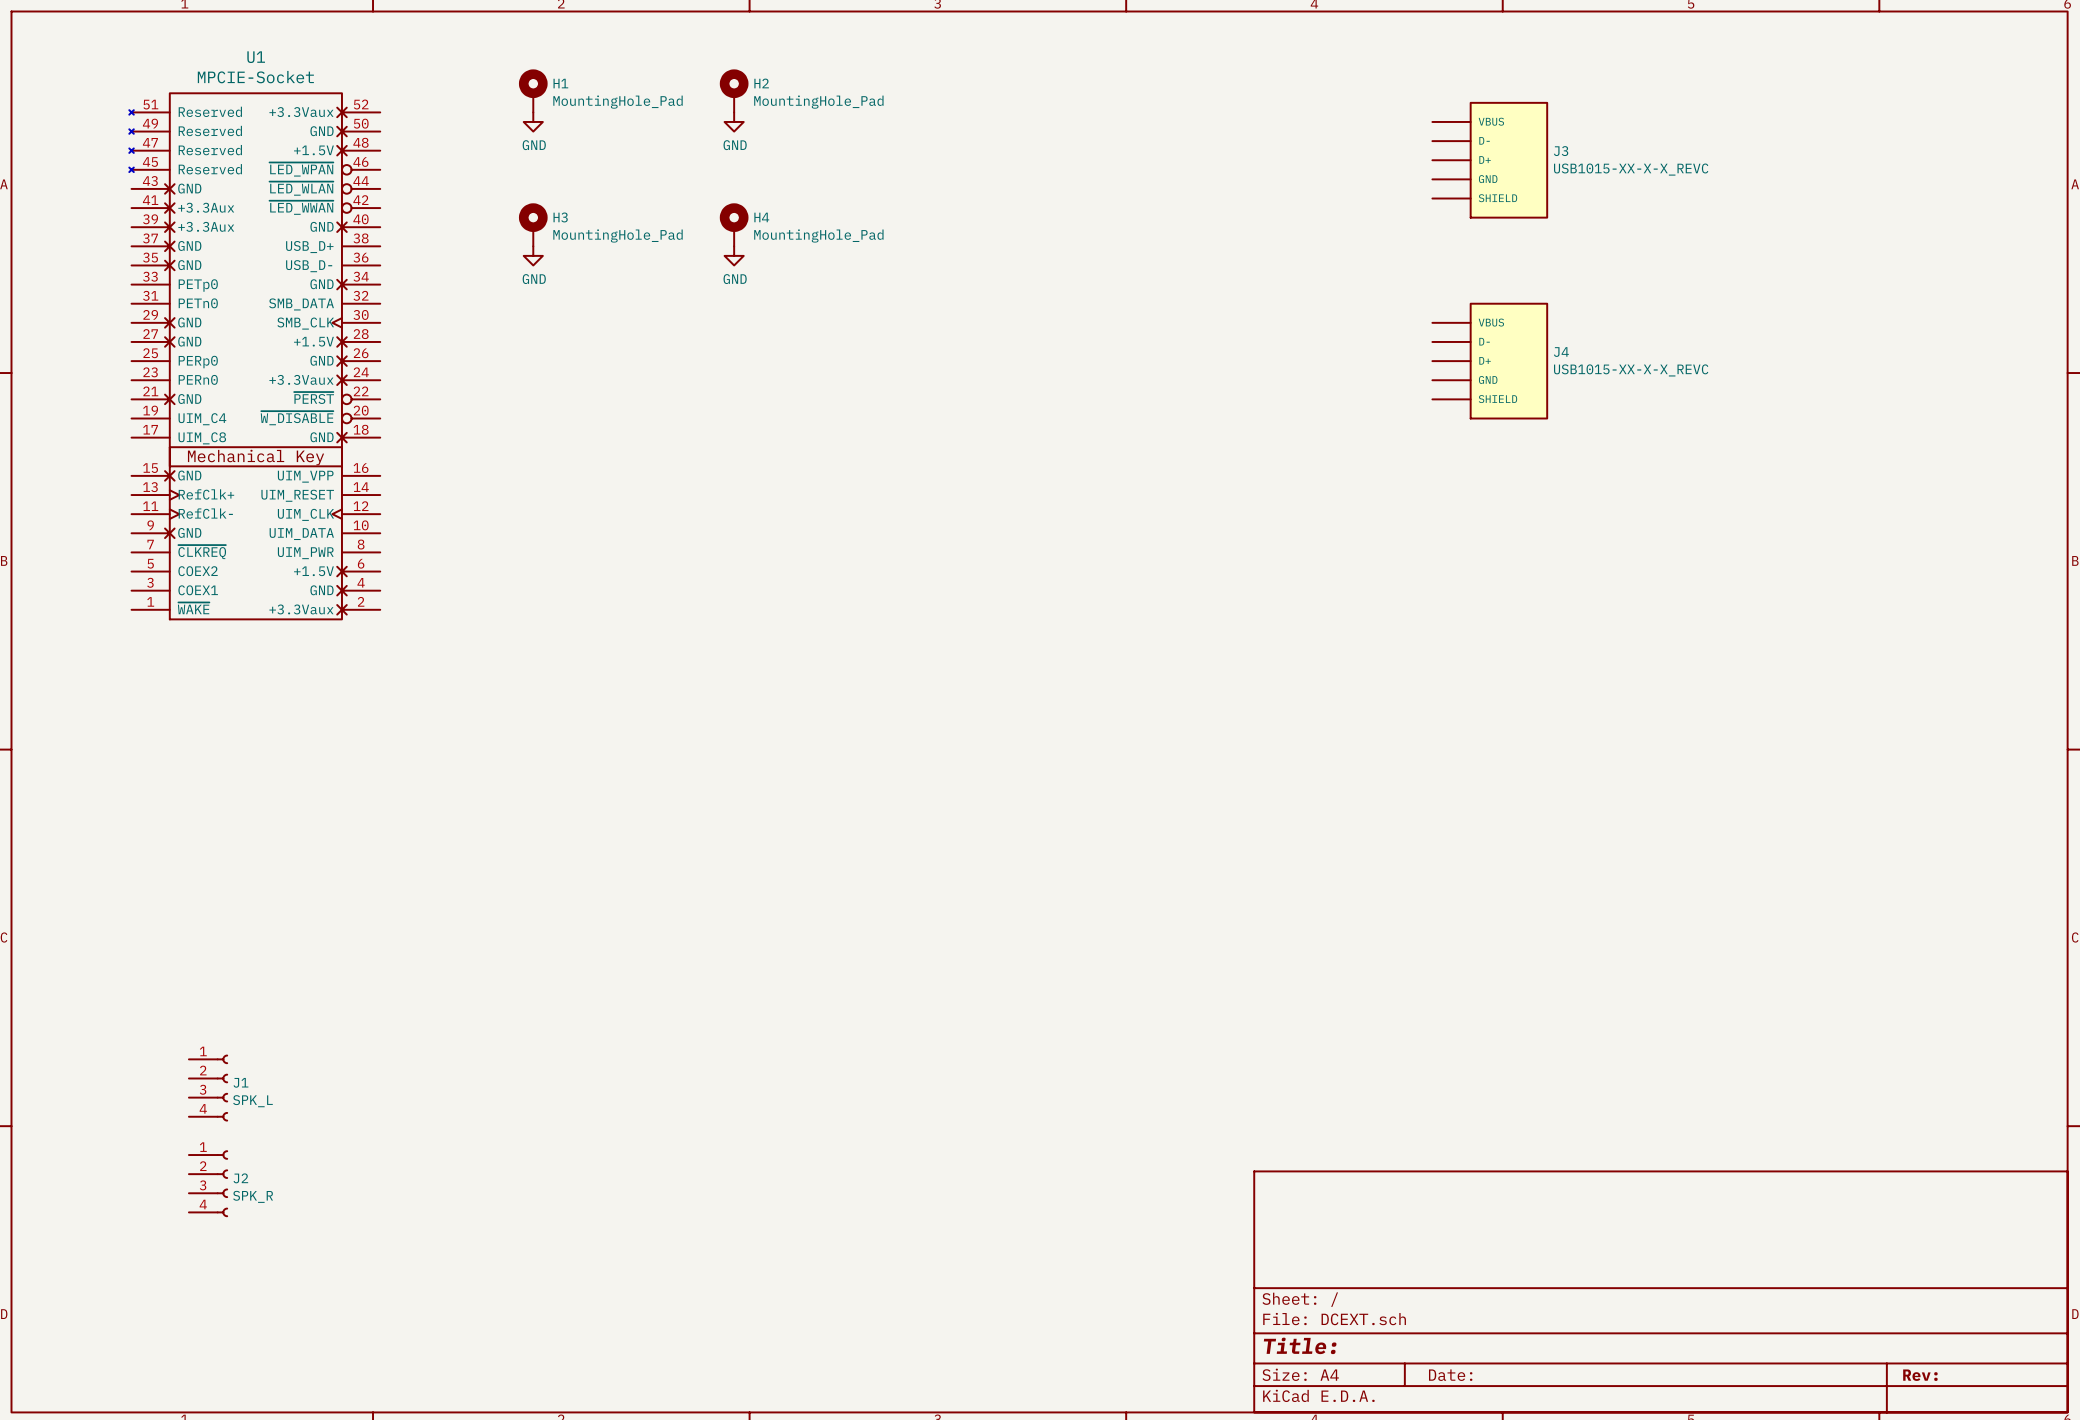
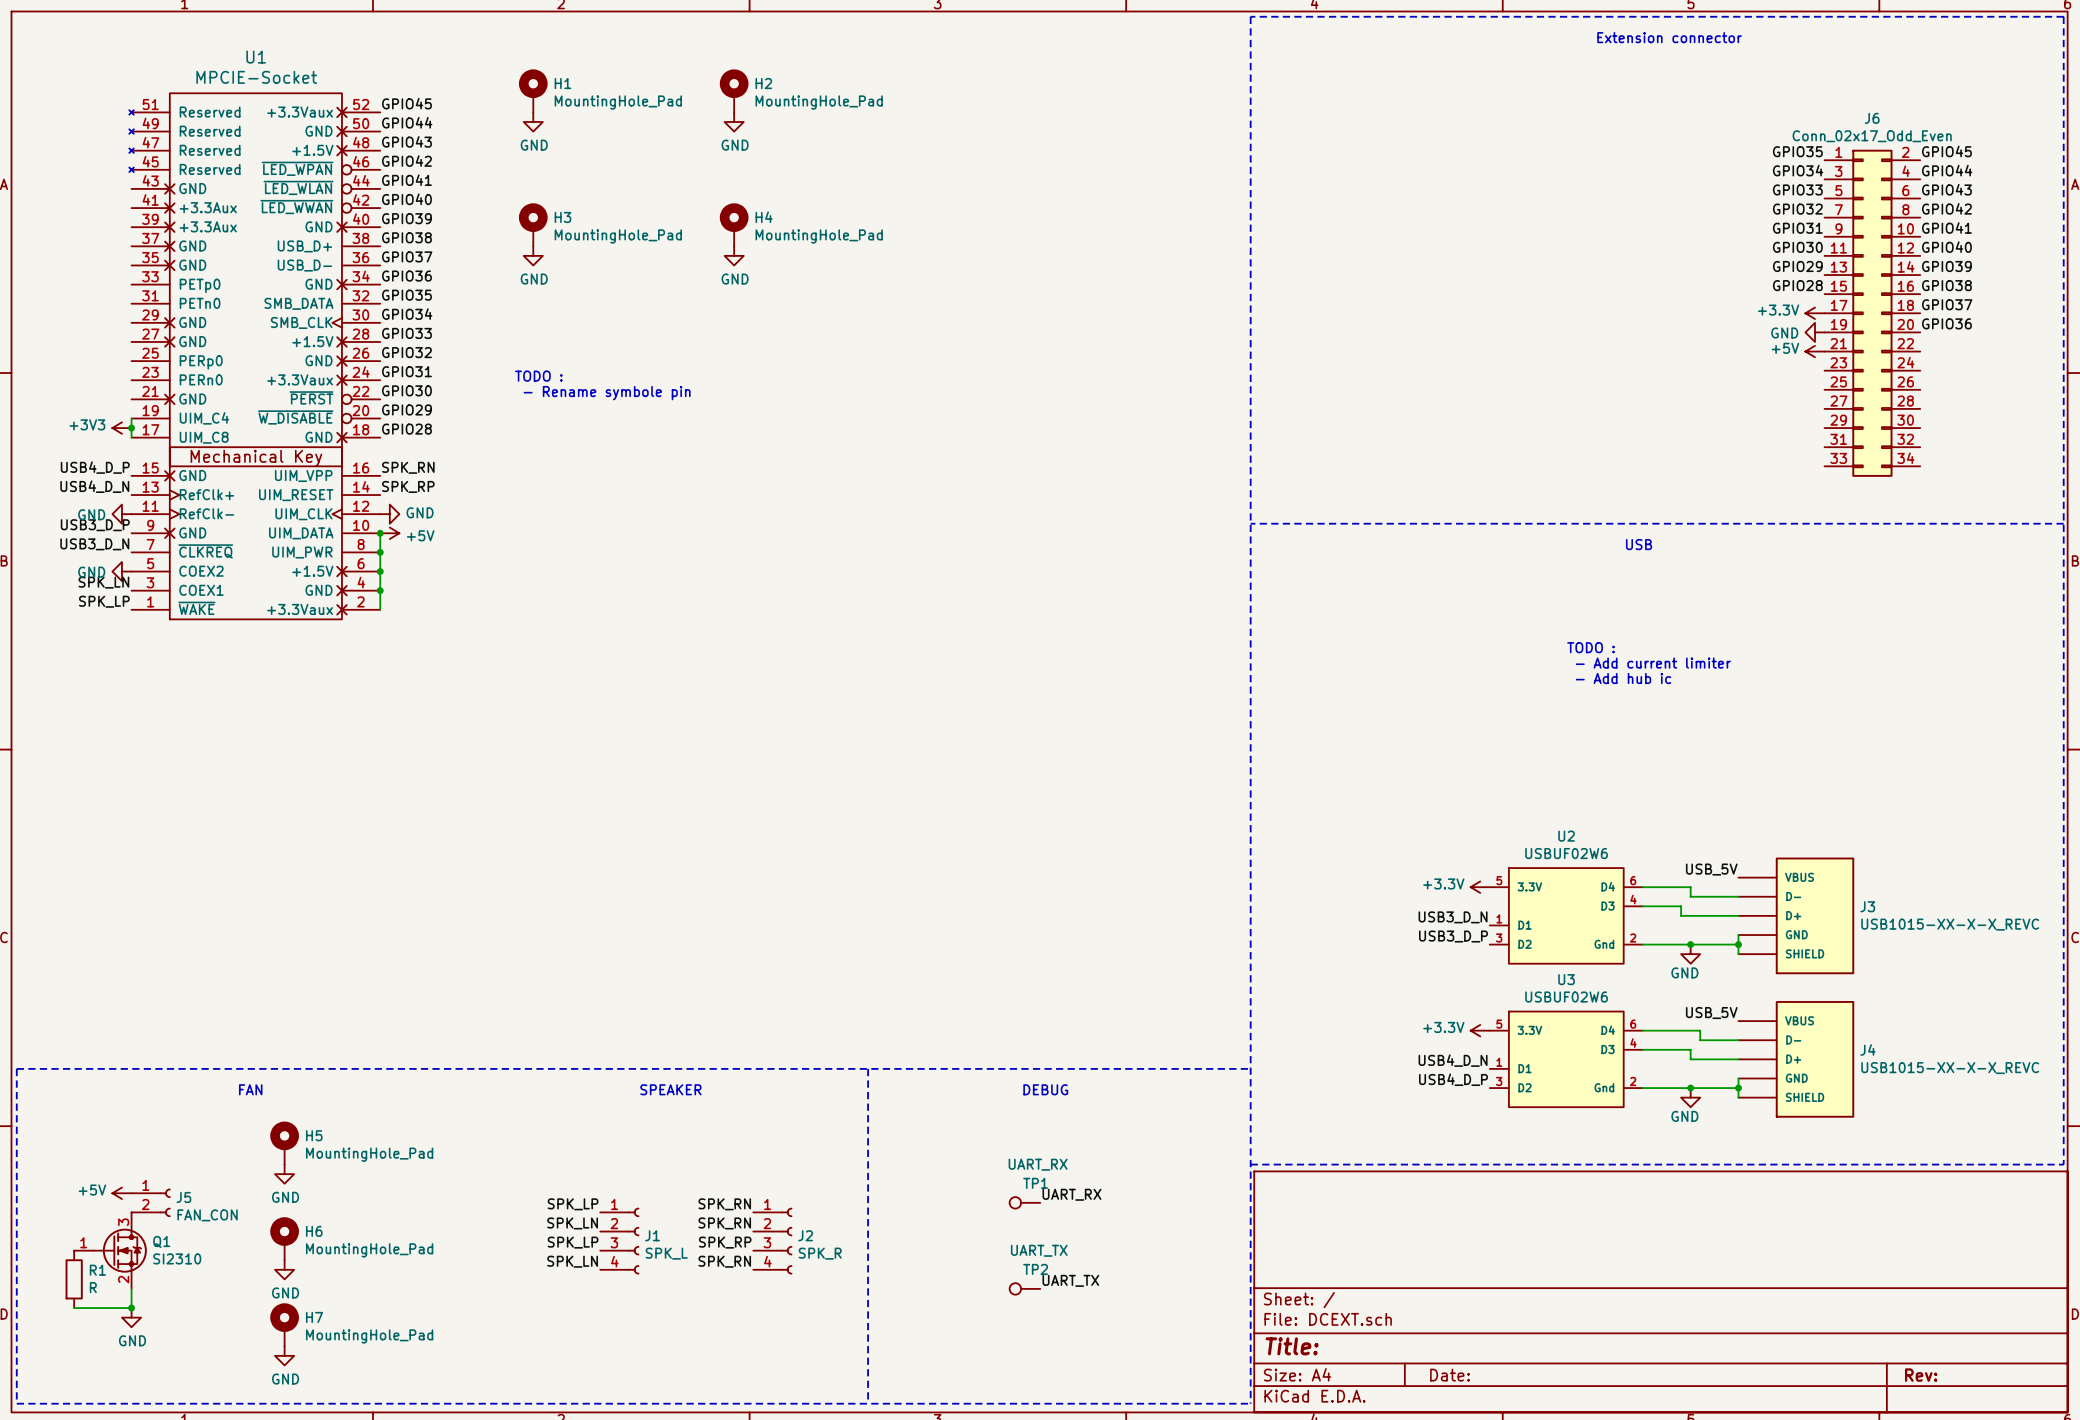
text: none -> Extension connector (1669, 37)
label: none -> GPIO45 (406, 103)
label: none -> GPIO44 (407, 122)
label: none -> GPIO43 (406, 141)
label: none -> GPIO35 (1797, 151)
label: none -> GPIO45 (1946, 151)
J3 position: (1490, 160) -> (1796, 915)
label: none -> GPIO42 (406, 161)
label: none -> GPIO34 (1798, 170)
label: none -> GPIO44 (1947, 170)
label: none -> GPIO41 (406, 180)
label: none -> GPIO33 (1797, 189)
label: none -> GPIO43 (1946, 189)
label: none -> GPIO40 (406, 199)
label: none -> GPIO32 (1797, 209)
label: none -> GPIO42 (1946, 208)
label: none -> GPIO39 (406, 218)
label: none -> GPIO31 (1797, 228)
label: none -> GPIO41 (1946, 228)
label: none -> GPIO38 (406, 237)
label: none -> GPIO30 (1797, 247)
label: none -> GPIO40 (1946, 247)
label: none -> GPIO37 (407, 256)
label: none -> GPIO29 (1797, 266)
label: none -> GPIO39 (1946, 266)
label: none -> GPIO36 (406, 276)
label: none -> GPIO28 (1797, 285)
label: none -> GPIO38 (1946, 285)
label: none -> GPIO35 (406, 295)
label: none -> GPIO37 (1947, 304)
power symbol: none -> +3.3V (1815, 313)
J6: none -> Conn_02x17_Odd_Even (1872, 313)
label: none -> GPIO34 (407, 314)
label: none -> GPIO36 (1946, 323)
power symbol: none -> GND (1815, 332)
label: none -> GPIO33 (406, 333)
power symbol: none -> +5V (1815, 351)
label: none -> GPIO32 (406, 352)
J4 position: (1490, 361) -> (1796, 1059)
label: none -> GPIO31 (406, 371)
text: none -> TODO : (538, 376)
label: none -> GPIO30 (406, 390)
text: none -> - Rename symbole pin (607, 393)
label: none -> GPIO29 (406, 409)
wire: none -> (131, 418) (131, 437)
power symbol: none -> +3V3 (121, 428)
junction: none -> (131, 428)
label: none -> GPIO28 (406, 429)
label: none -> USB4_D_P (95, 467)
label: none -> SPK_RN (408, 467)
label: none -> USB4_D_N (94, 486)
label: none -> SPK_RP (408, 486)
power symbol: none -> GND (121, 514)
power symbol: none -> GND (389, 514)
line: none -> (1250, 523) (2063, 523)
label: none -> USB3_D_P (95, 525)
wire: none -> (380, 533) (380, 609)
junction: none -> (380, 533)
power symbol: none -> +5V (389, 533)
label: none -> USB3_D_N (94, 544)
text: none -> USB (1639, 544)
junction: none -> (380, 552)
power symbol: none -> GND (121, 571)
junction: none -> (380, 571)
label: none -> SPK_LN (103, 582)
junction: none -> (380, 590)
label: none -> SPK_LP (104, 601)
text: none -> TODO : (1590, 647)
text: none -> - Add current limiter (1653, 663)
text: none -> - Add hub ic (1623, 678)
label: none -> USB_5V (1711, 869)
power symbol: none -> +3.3V (1480, 887)
wire: none -> (1642, 887) (1690, 887) (1690, 896) (1738, 896)
wire: none -> (1642, 906) (1681, 906) (1681, 915) (1738, 915)
U2: none -> USBUF02W6 (1566, 915)
label: none -> USB3_D_N (1453, 917)
wire: none -> (1738, 935) (1738, 954)
label: none -> USB3_D_P (1453, 936)
wire: none -> (1642, 944) (1738, 944)
junction: none -> (1690, 944)
junction: none -> (1738, 944)
power symbol: none -> GND (1690, 954)
label: none -> USB_5V (1711, 1013)
power symbol: none -> +3.3V (1480, 1030)
wire: none -> (1642, 1030) (1700, 1030) (1700, 1040) (1738, 1040)
wire: none -> (1642, 1049) (1690, 1049) (1690, 1059) (1738, 1059)
U3: none -> USBUF02W6 (1566, 1059)
label: none -> USB4_D_N (1453, 1060)
line: none -> (868, 1068) (868, 1403)
line: none -> (1250, 1068) (16, 1068) (16, 1403) (1250, 1403) (1250, 16) (2063, 16) (2063, 1164) (1250, 1164)
wire: none -> (1738, 1078) (1738, 1097)
label: none -> USB4_D_P (1453, 1079)
J1 position: (208, 1088) -> (619, 1241)
wire: none -> (1642, 1088) (1738, 1088)
junction: none -> (1690, 1088)
junction: none -> (1738, 1088)
text: none -> FAN (250, 1089)
text: none -> SPEAKER (670, 1089)
text: none -> DEBUG (1045, 1089)
power symbol: none -> GND (1690, 1097)
H5: none -> MountingHole_Pad (284, 1143)
power symbol: none -> GND (284, 1174)
J2 position: (208, 1183) -> (772, 1241)
power symbol: none -> +5V (121, 1193)
label: none -> UART_RX (1071, 1194)
J5: none -> FAN_CON (150, 1202)
TP1: none -> UART_RX (1024, 1202)
label: none -> SPK_LP (573, 1204)
label: none -> SPK_RN (724, 1204)
label: none -> SPK_LN (572, 1223)
label: none -> SPK_RN (724, 1223)
H6: none -> MountingHole_Pad (284, 1238)
label: none -> SPK_LP (573, 1242)
label: none -> SPK_RP (725, 1242)
Q1: none -> SI2310 (110, 1250)
label: none -> SPK_LN (572, 1261)
label: none -> SPK_RN (724, 1261)
power symbol: none -> GND (284, 1269)
R1: none -> R (74, 1279)
label: none -> UART_TX (1070, 1280)
wire: none -> (131, 1288) (131, 1308) (74, 1308)
TP2: none -> UART_TX (1024, 1288)
junction: none -> (131, 1308)
power symbol: none -> GND (131, 1317)
H7: none -> MountingHole_Pad (284, 1324)
power symbol: none -> GND (284, 1355)

